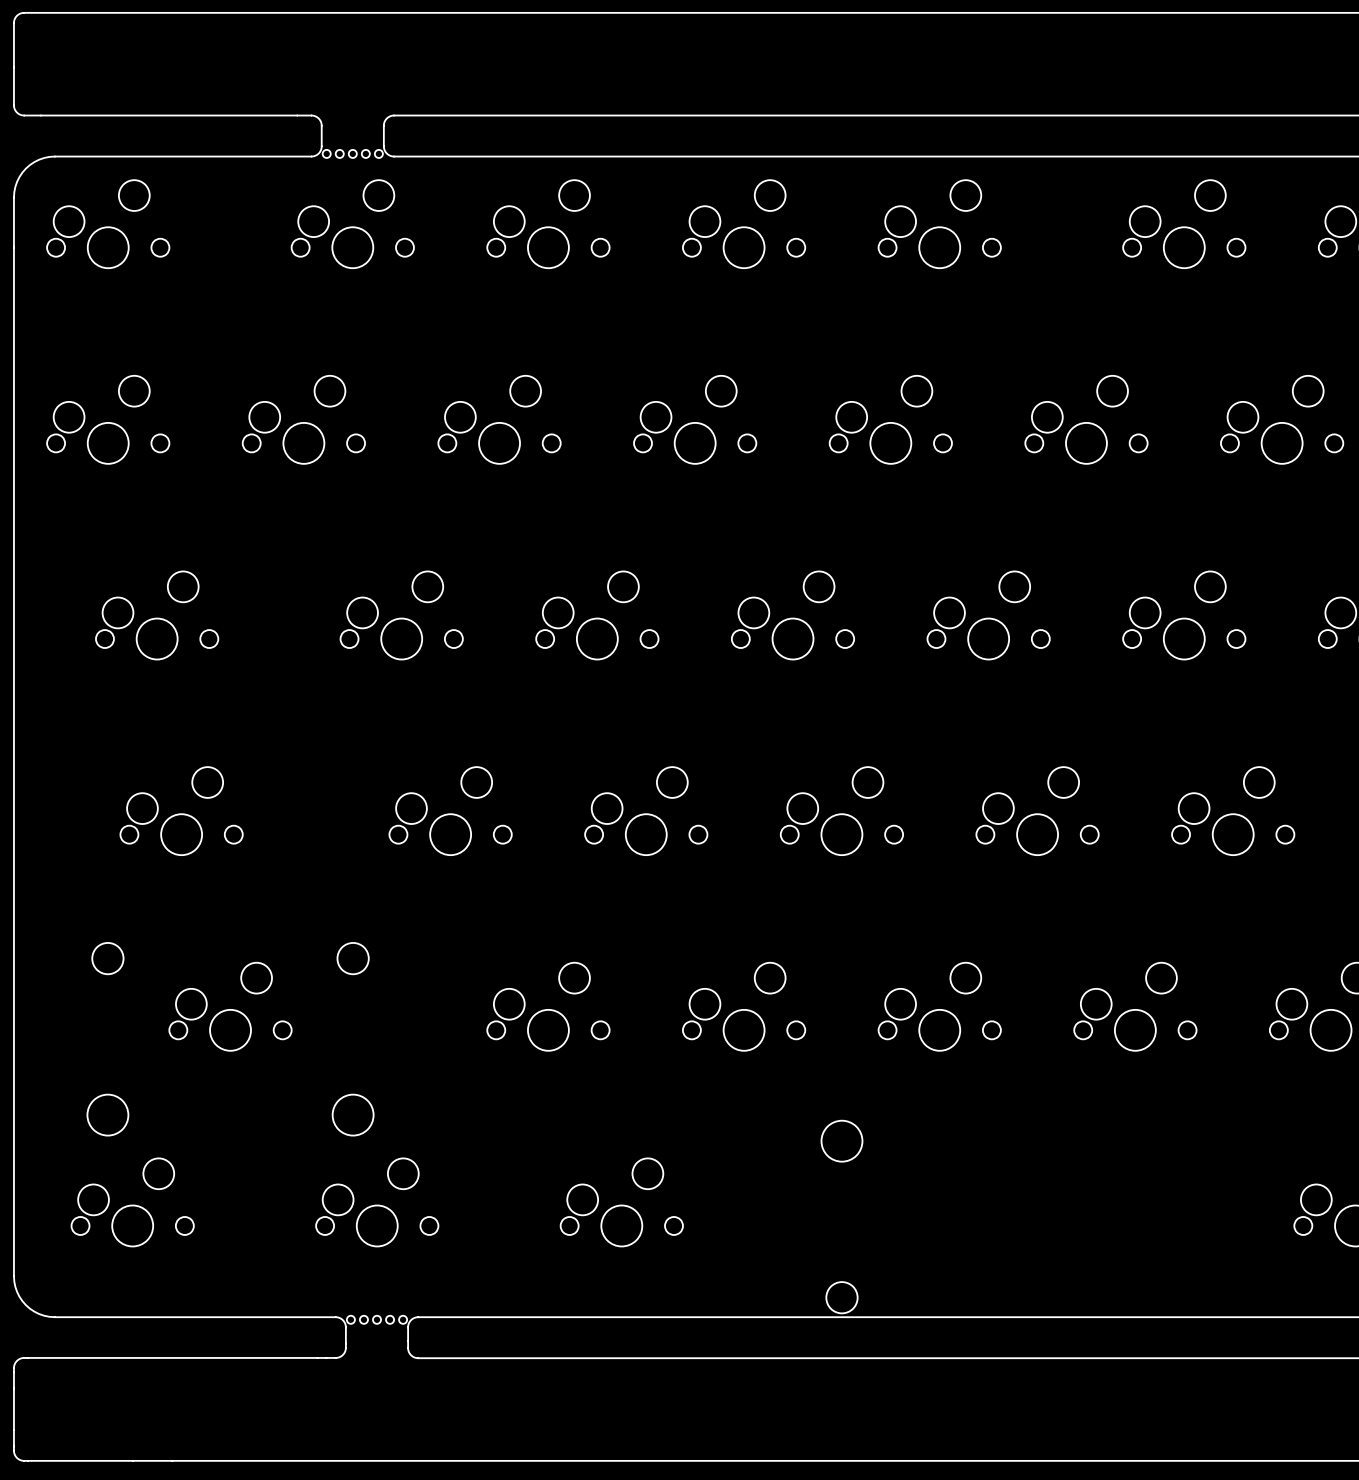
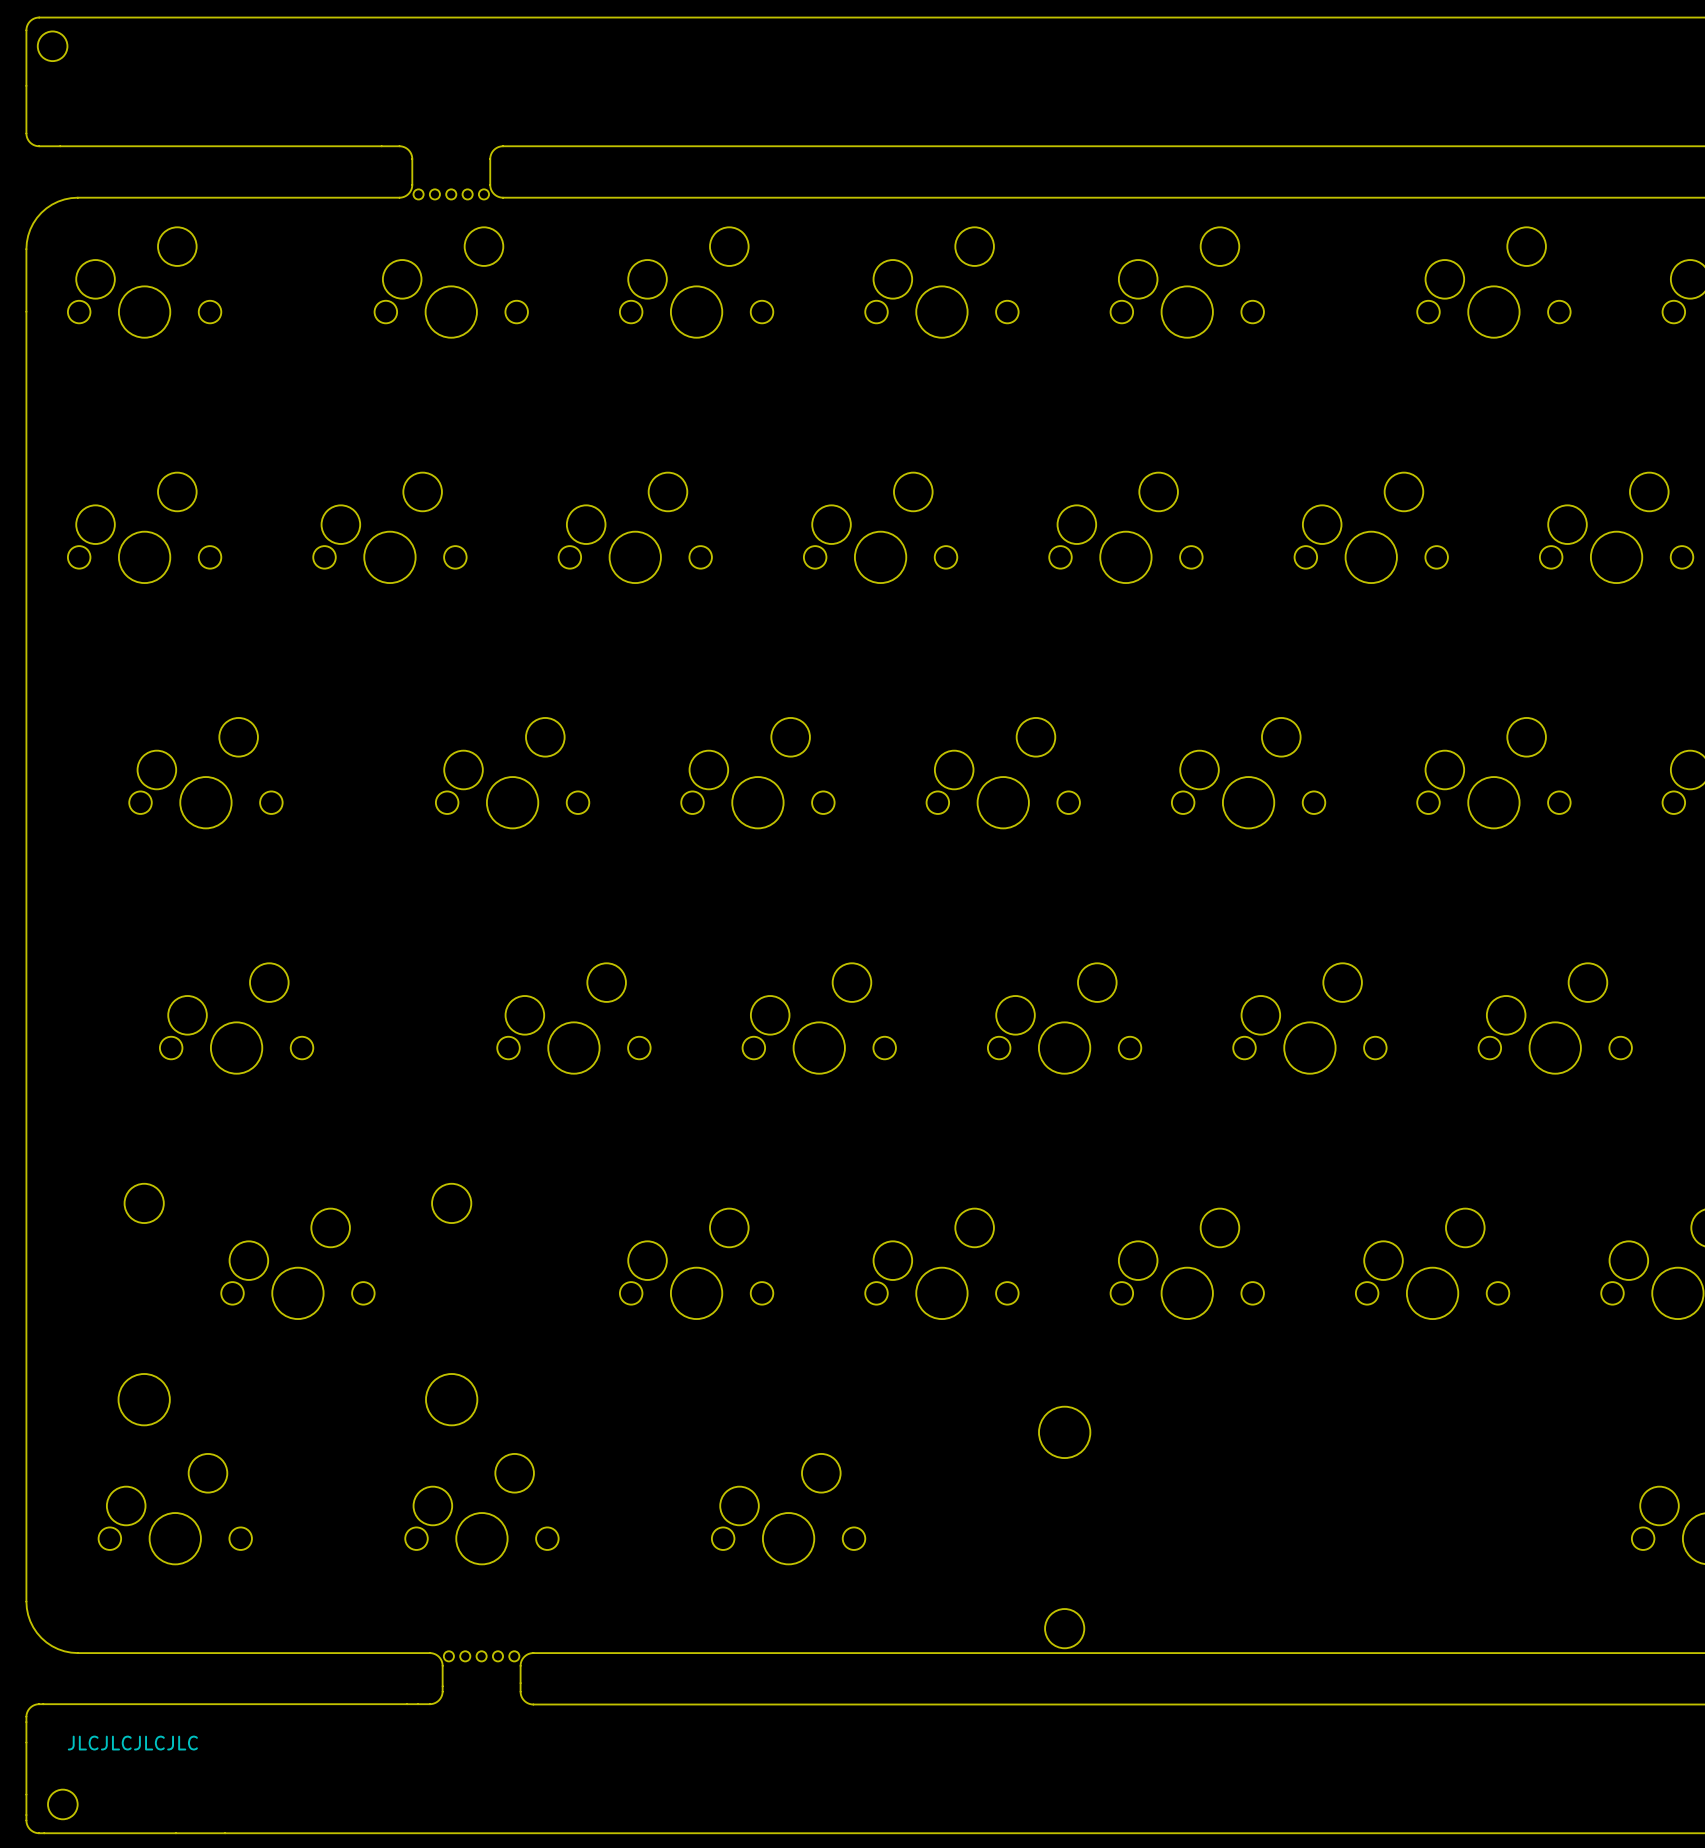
round board edge: none -> [37, 31, 68, 62]
text: none -> JLCJLCJLCJLC (132, 1743)
round board edge: none -> [47, 1789, 78, 1820]

